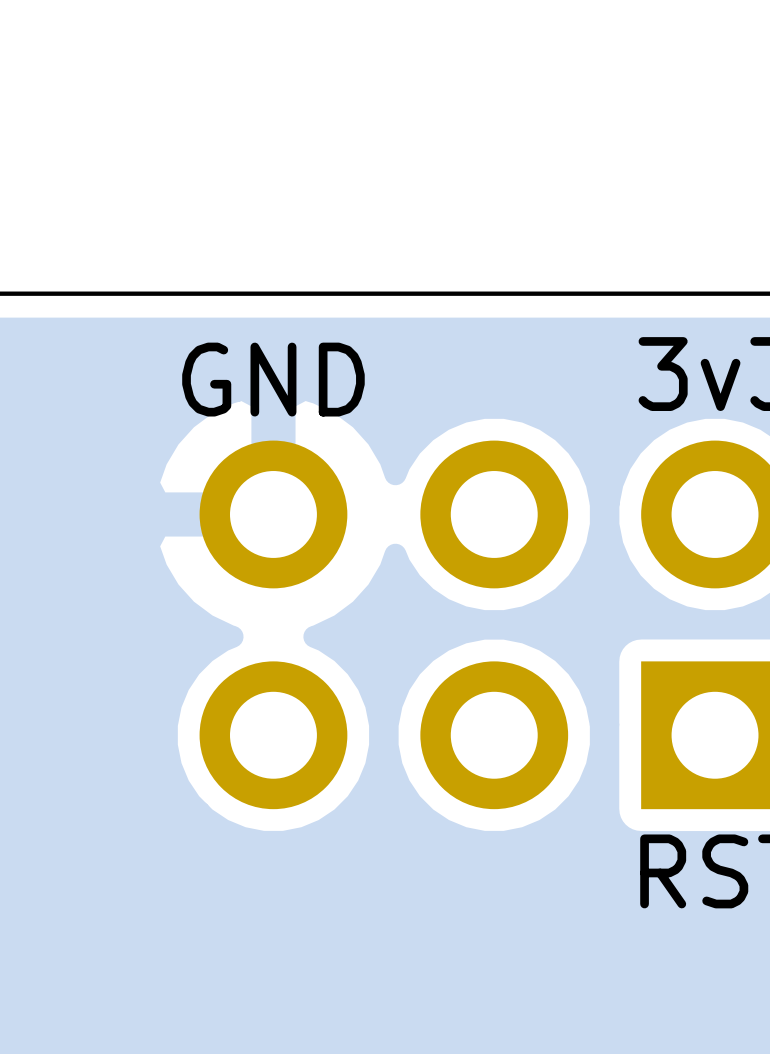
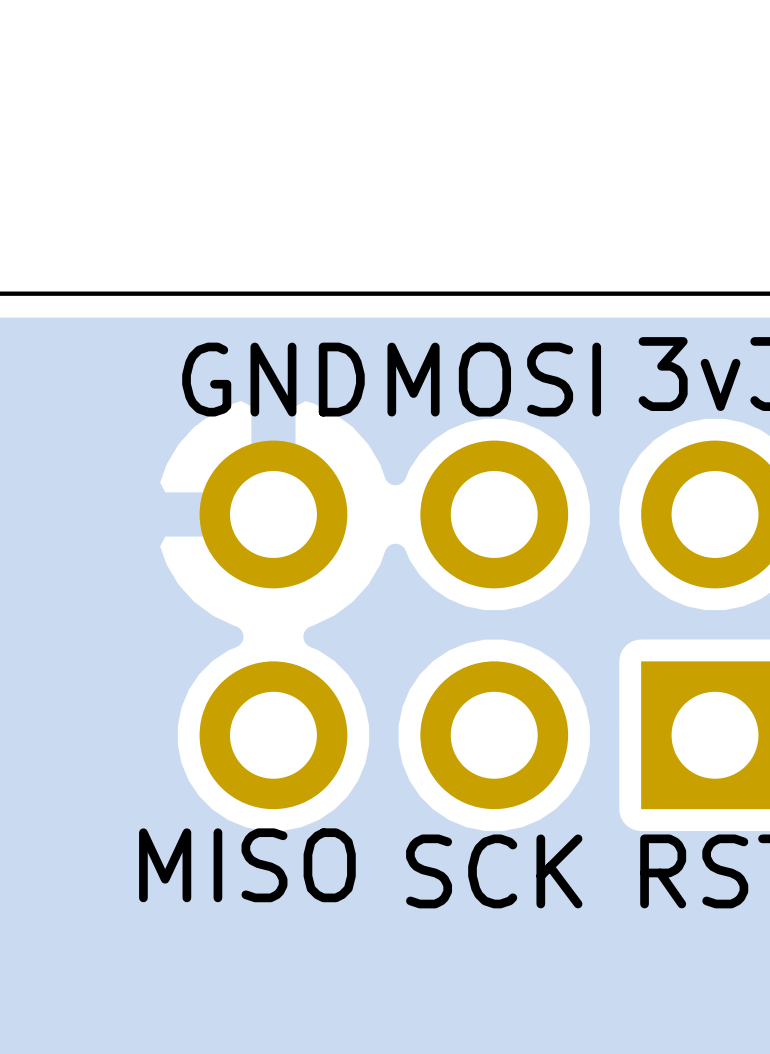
text: none -> MOSI (494, 379)
text: none -> MISO (247, 865)
text: none -> SCK (494, 871)

